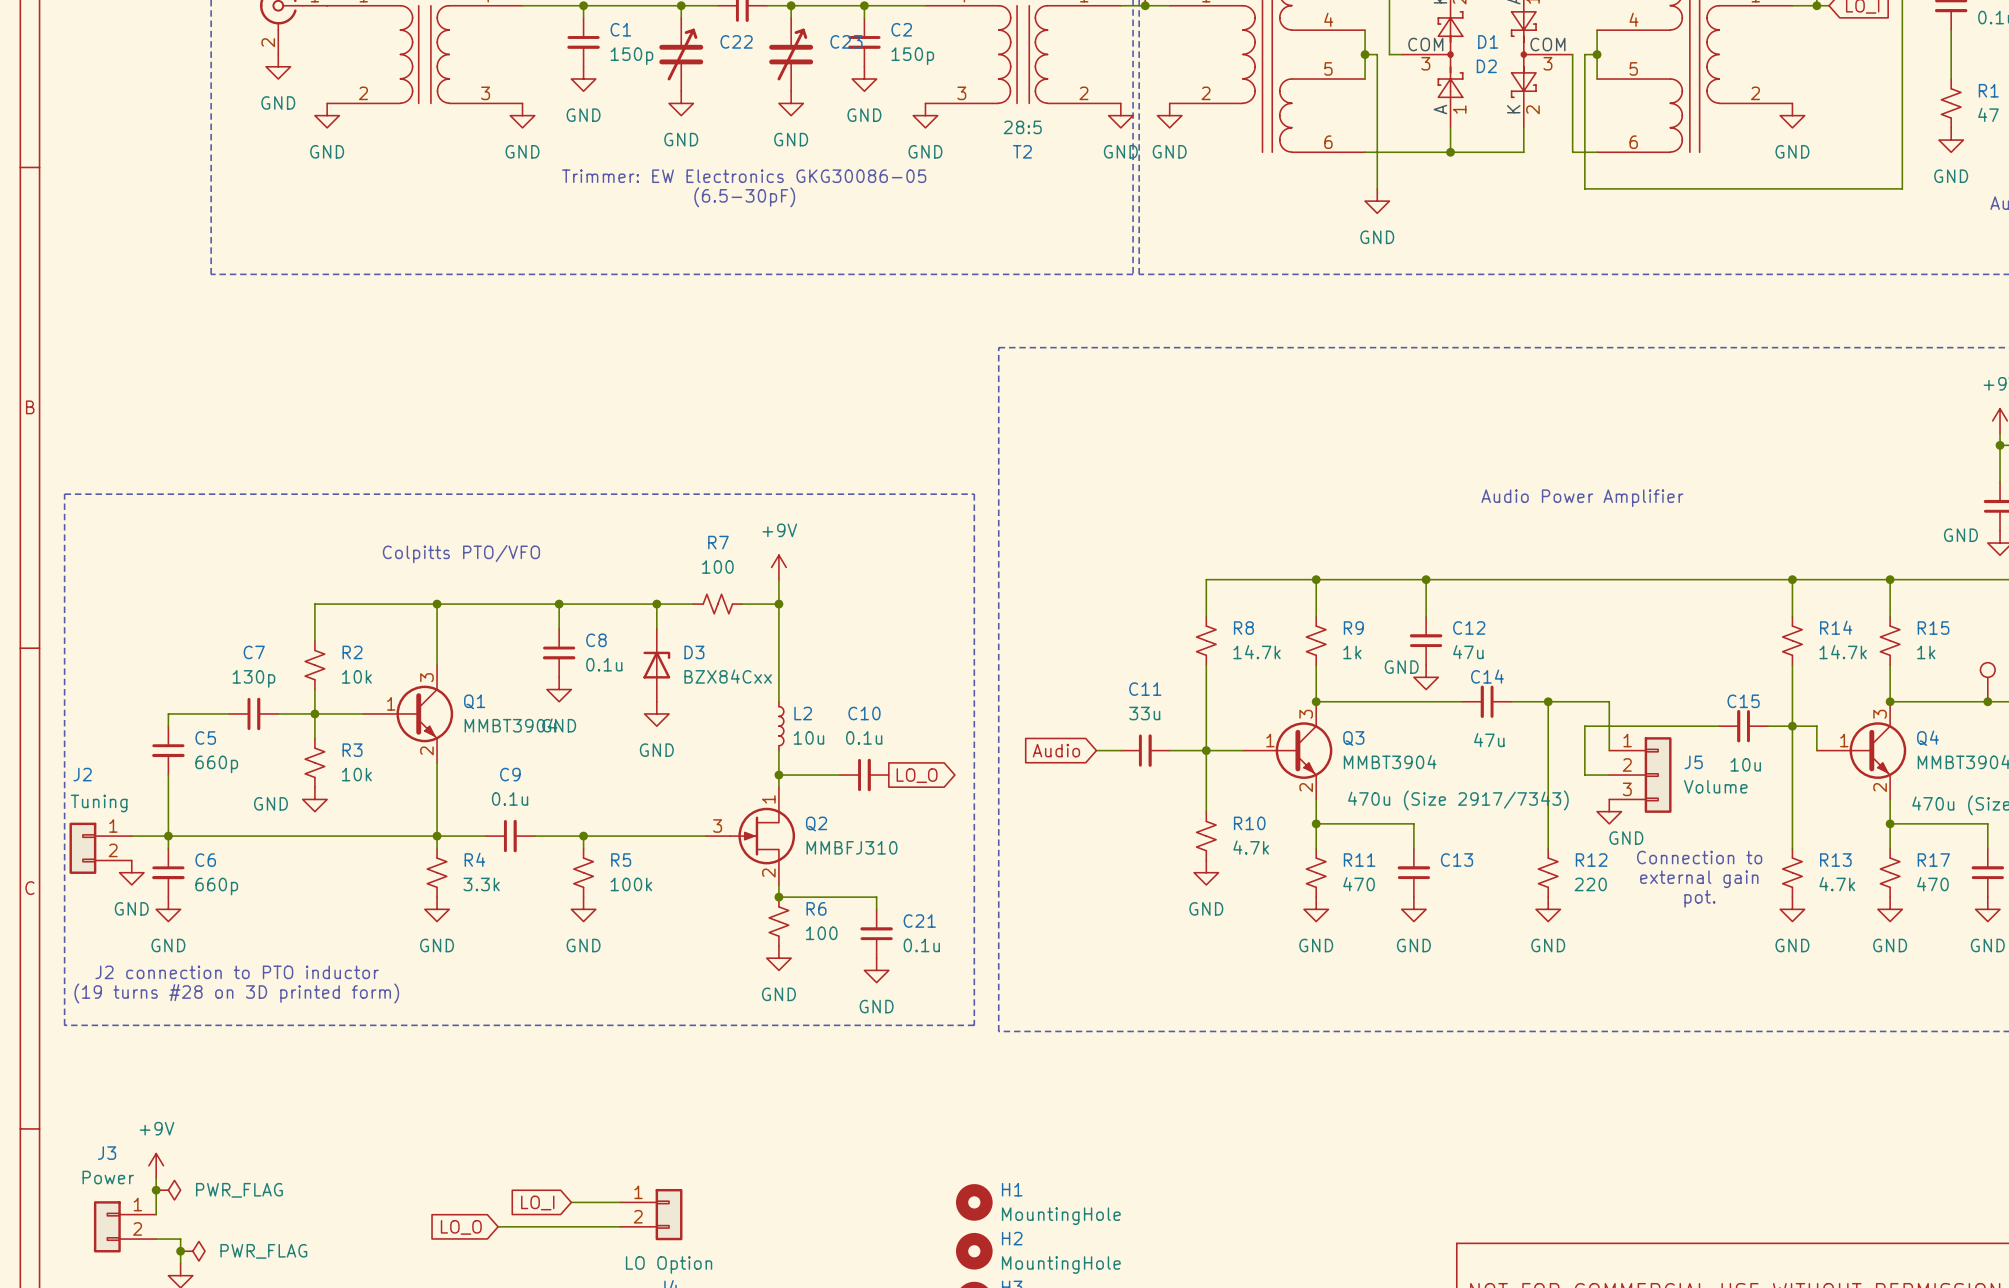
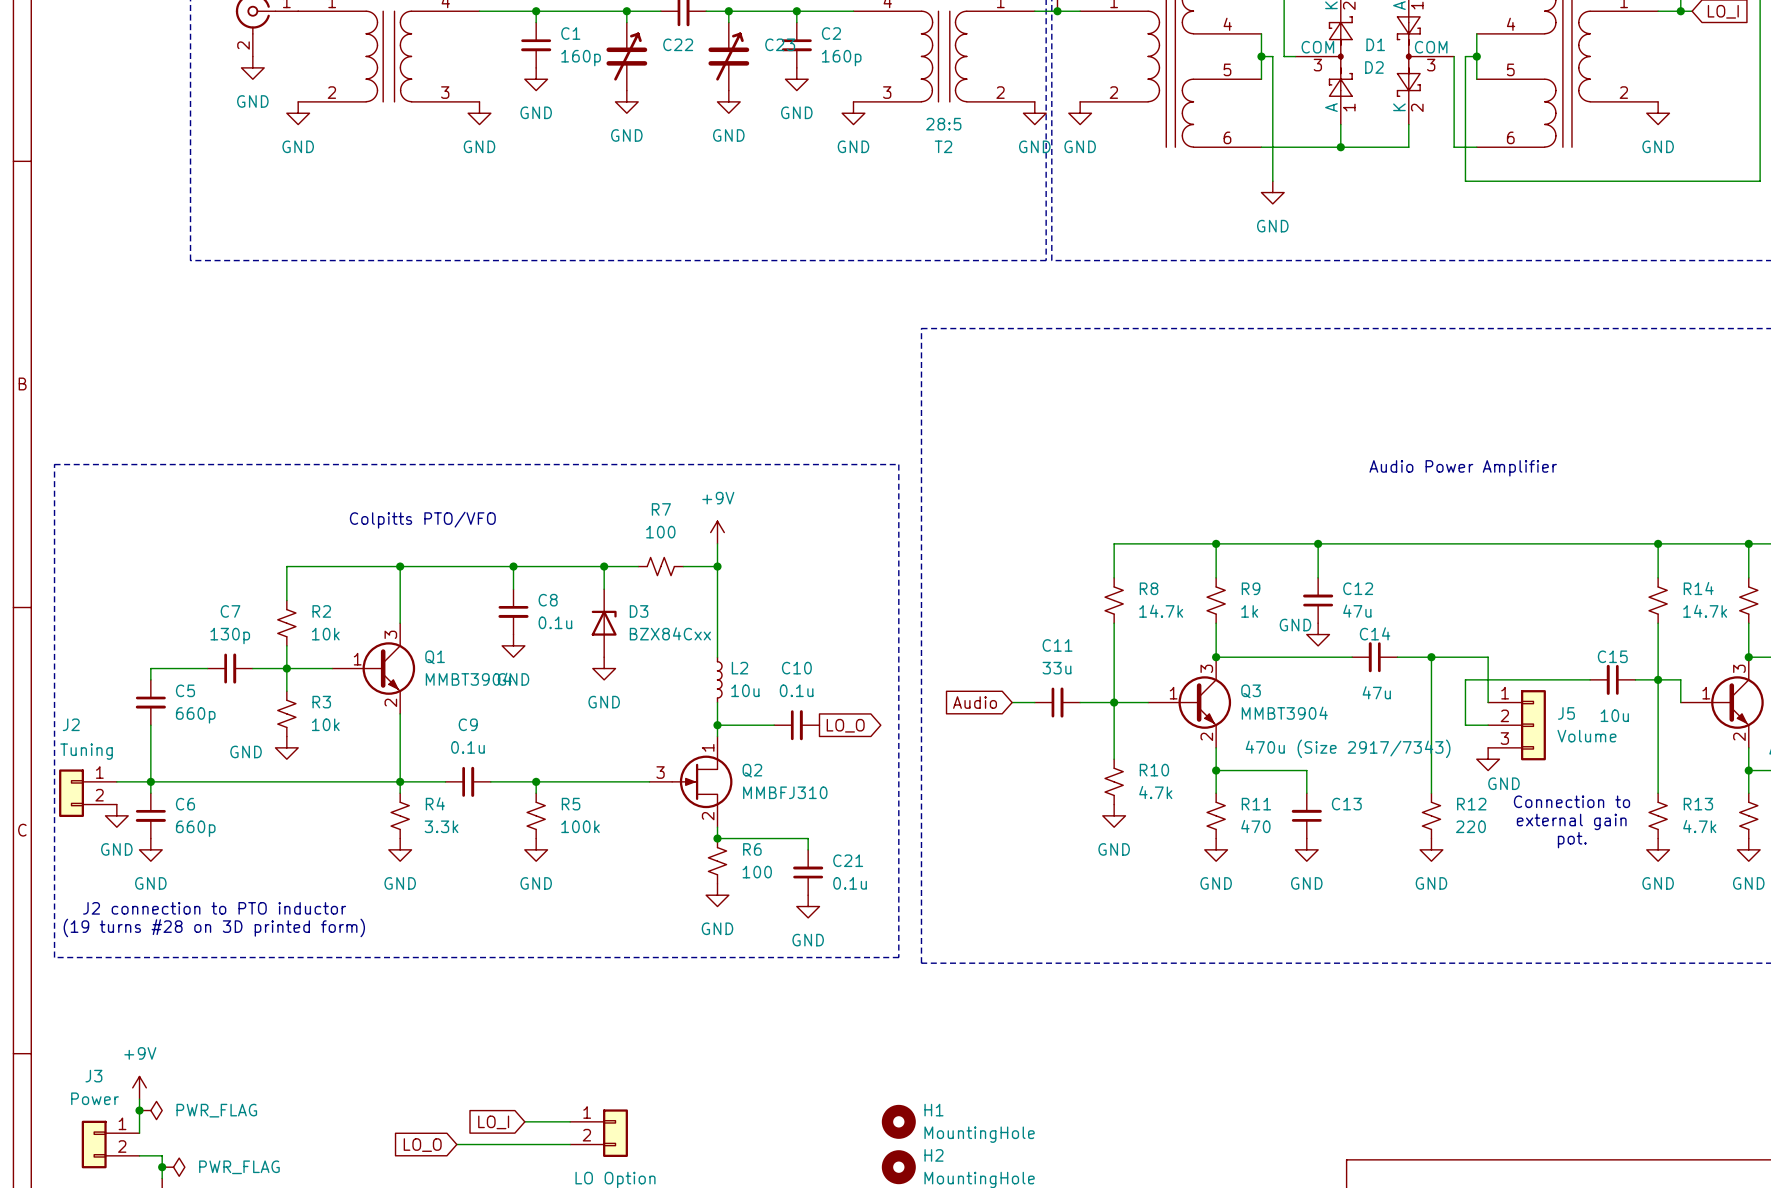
C1 value: 150p (631, 56) -> 160p (581, 58)
C2 value: 150p (912, 56) -> 160p (841, 58)
text: Trimmer: EW Electronics GKG30086-05 (744, 176) -> none
text: (6.5-30pF) (744, 197) -> none

